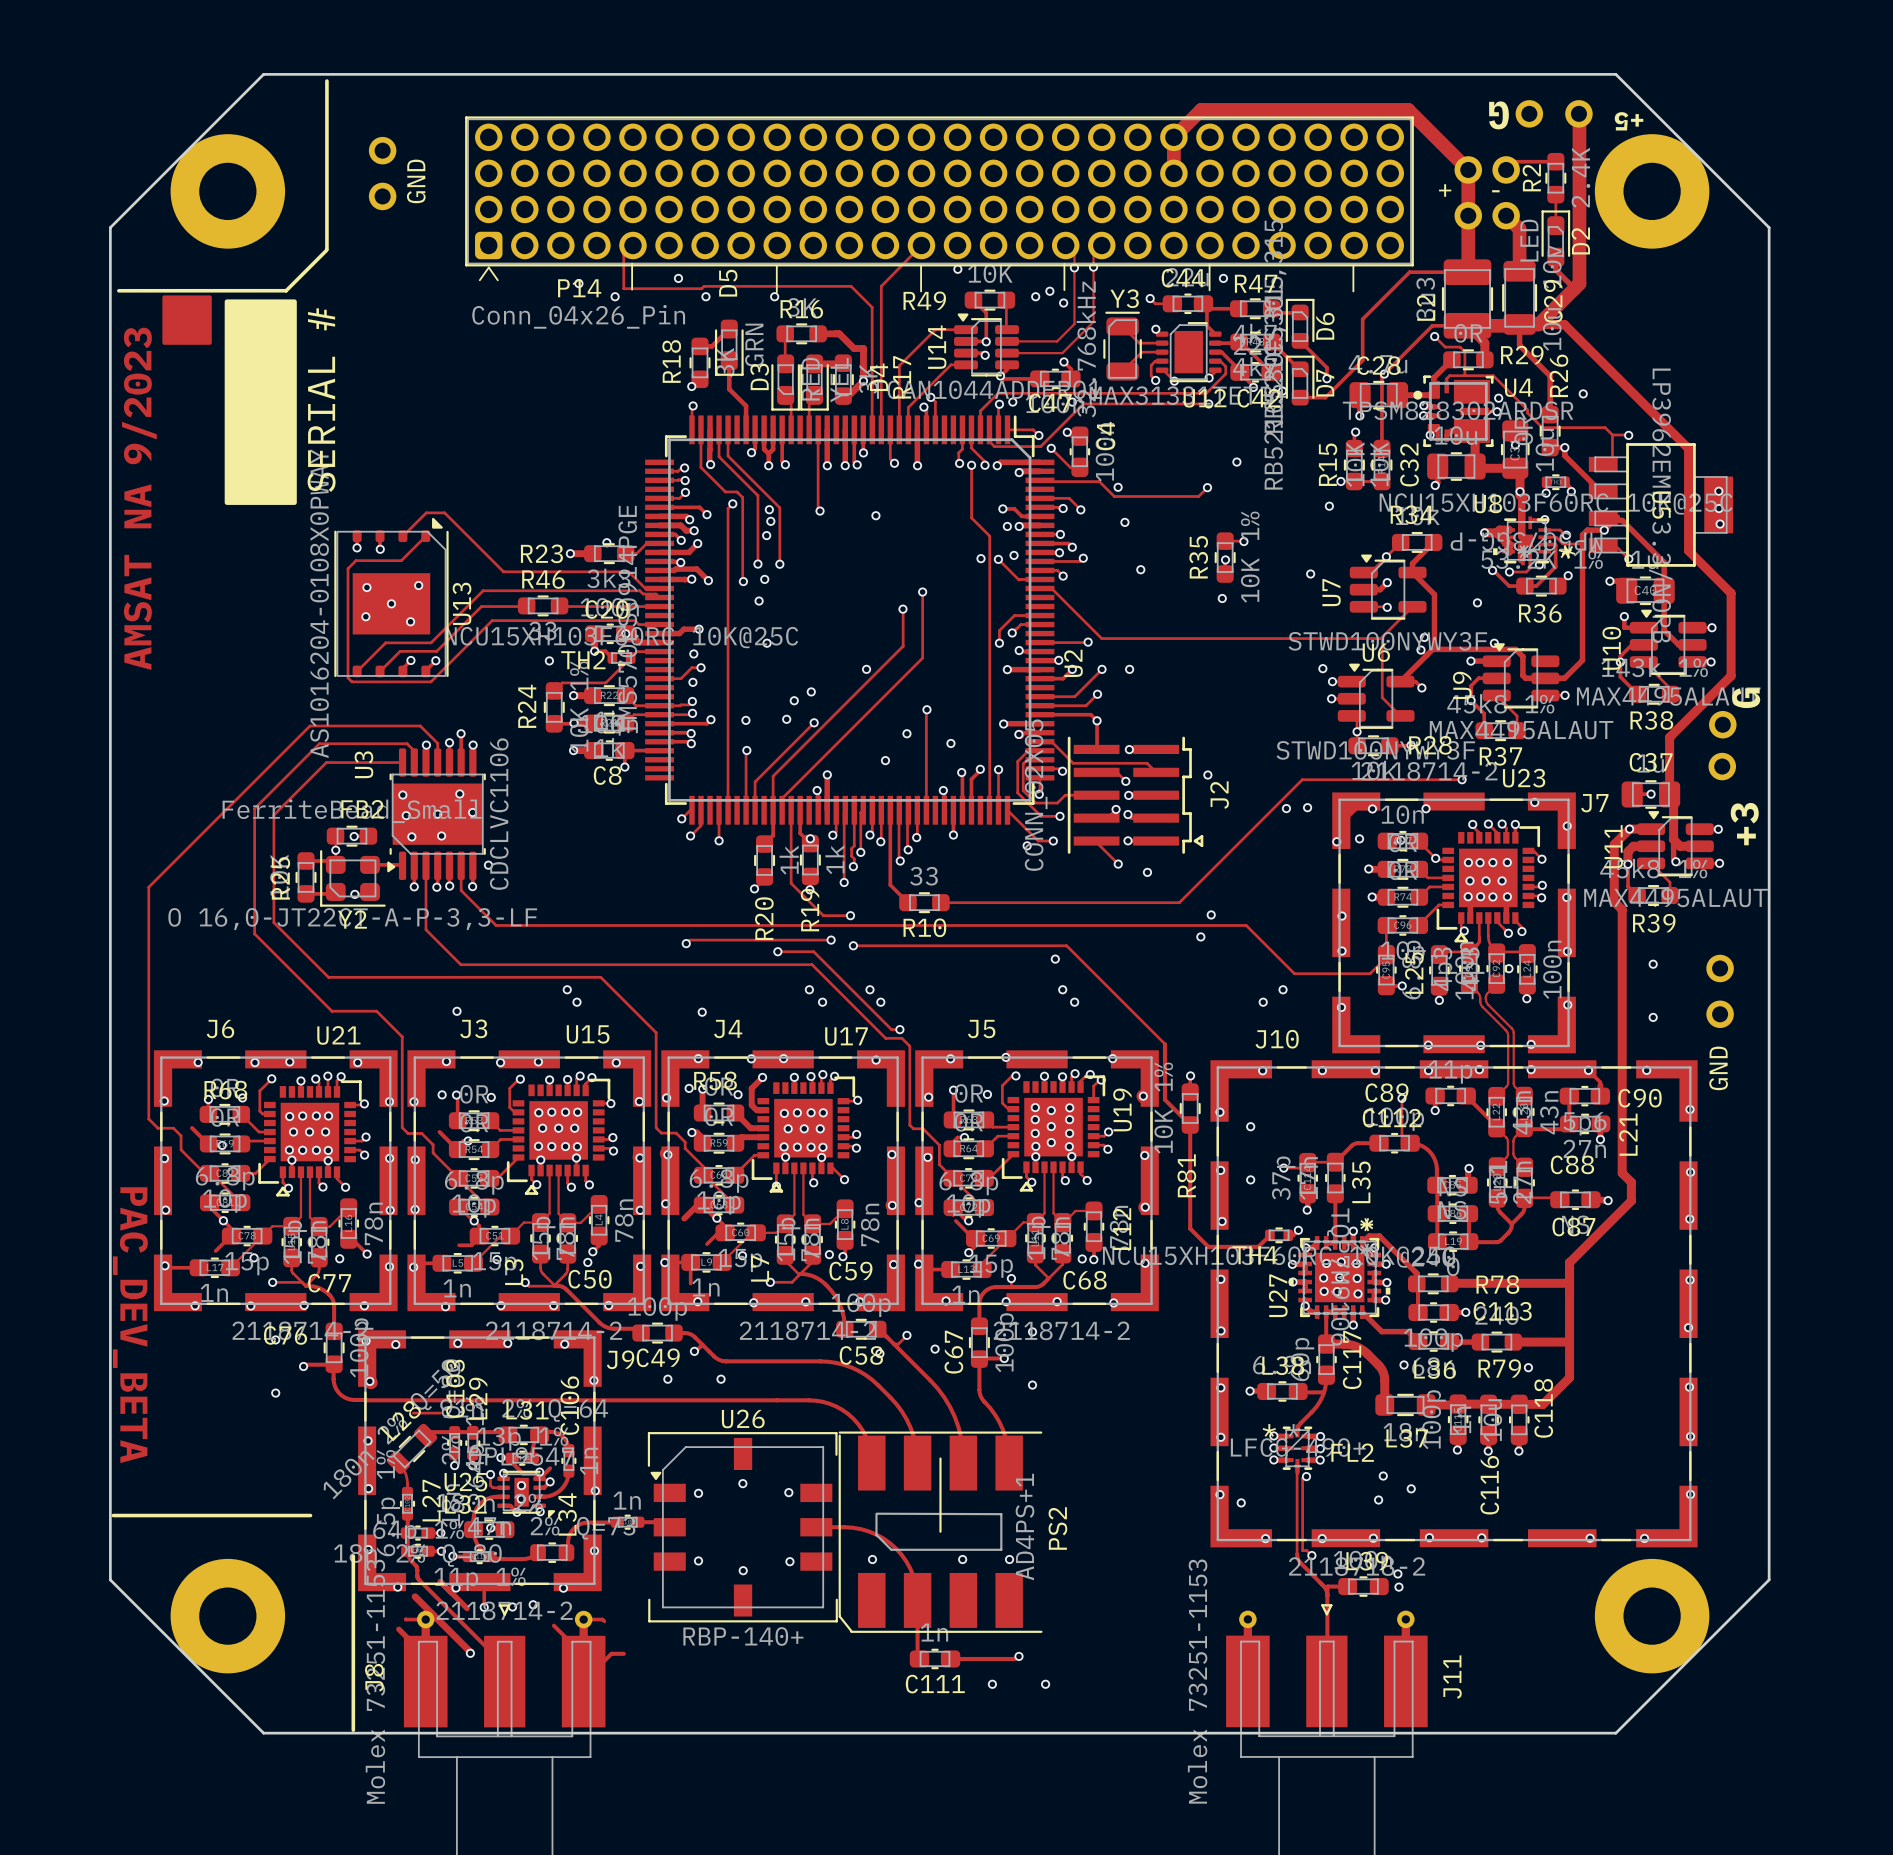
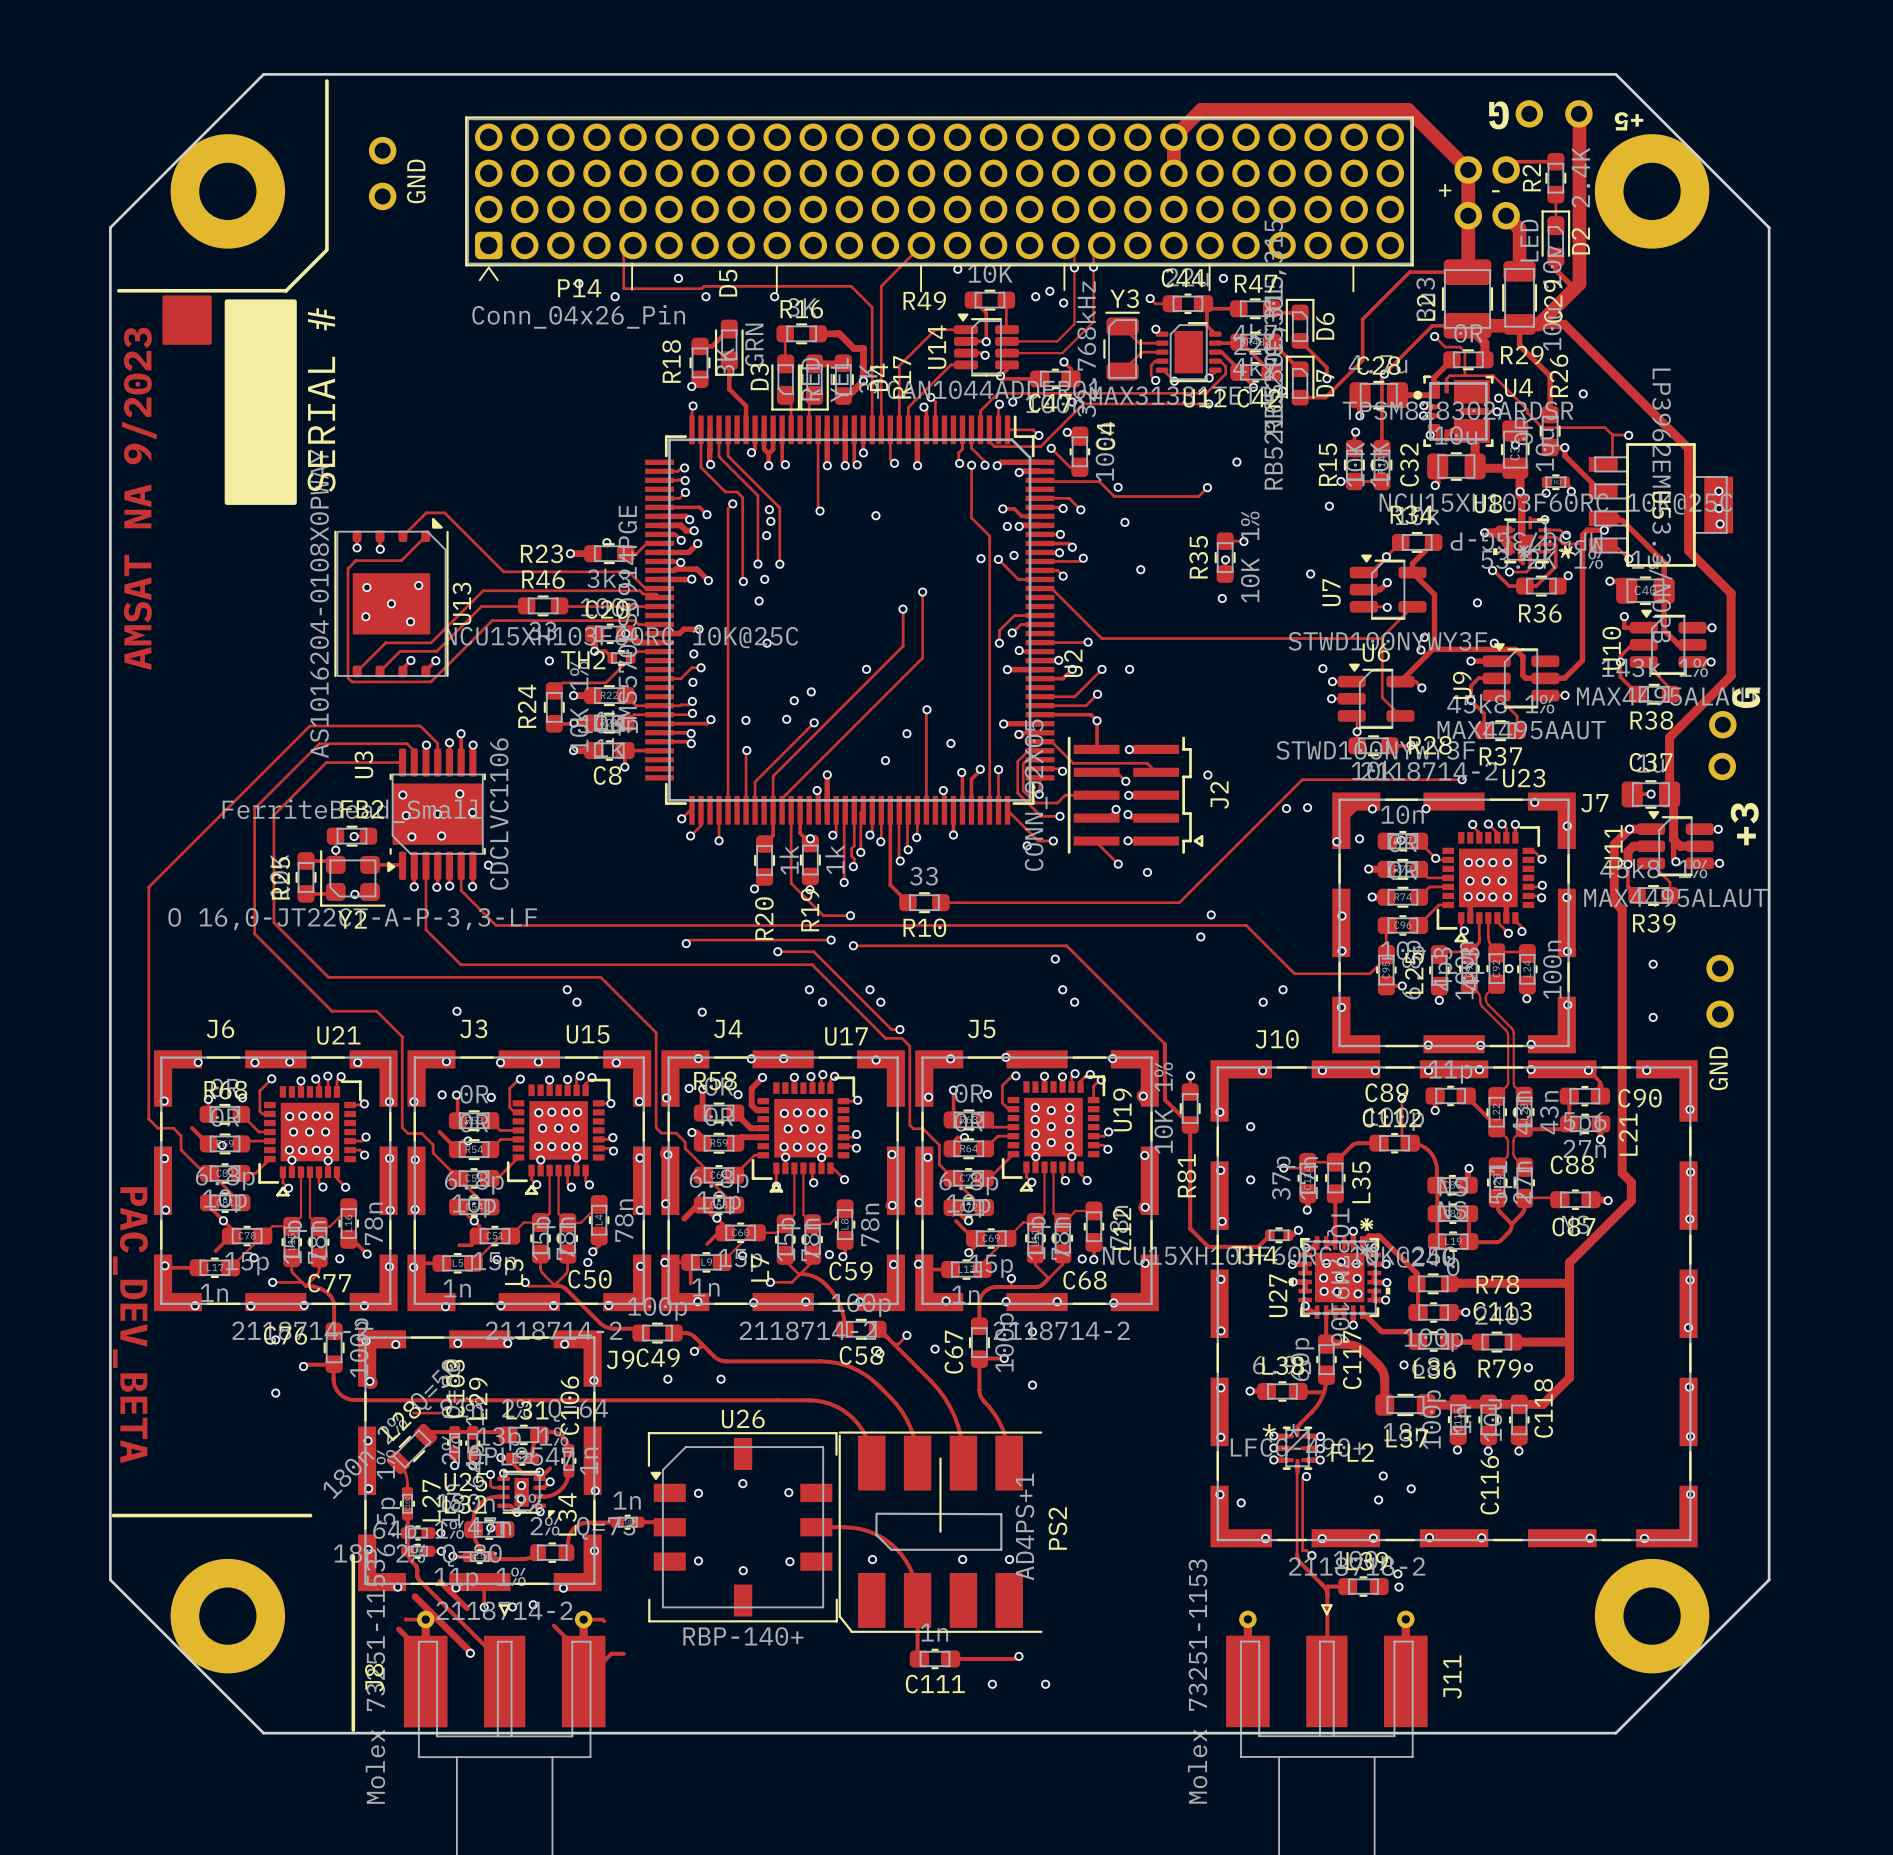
U9 value: MAX4495ALAUT (1521, 730) -> MAX4495AAUT (1521, 730)

